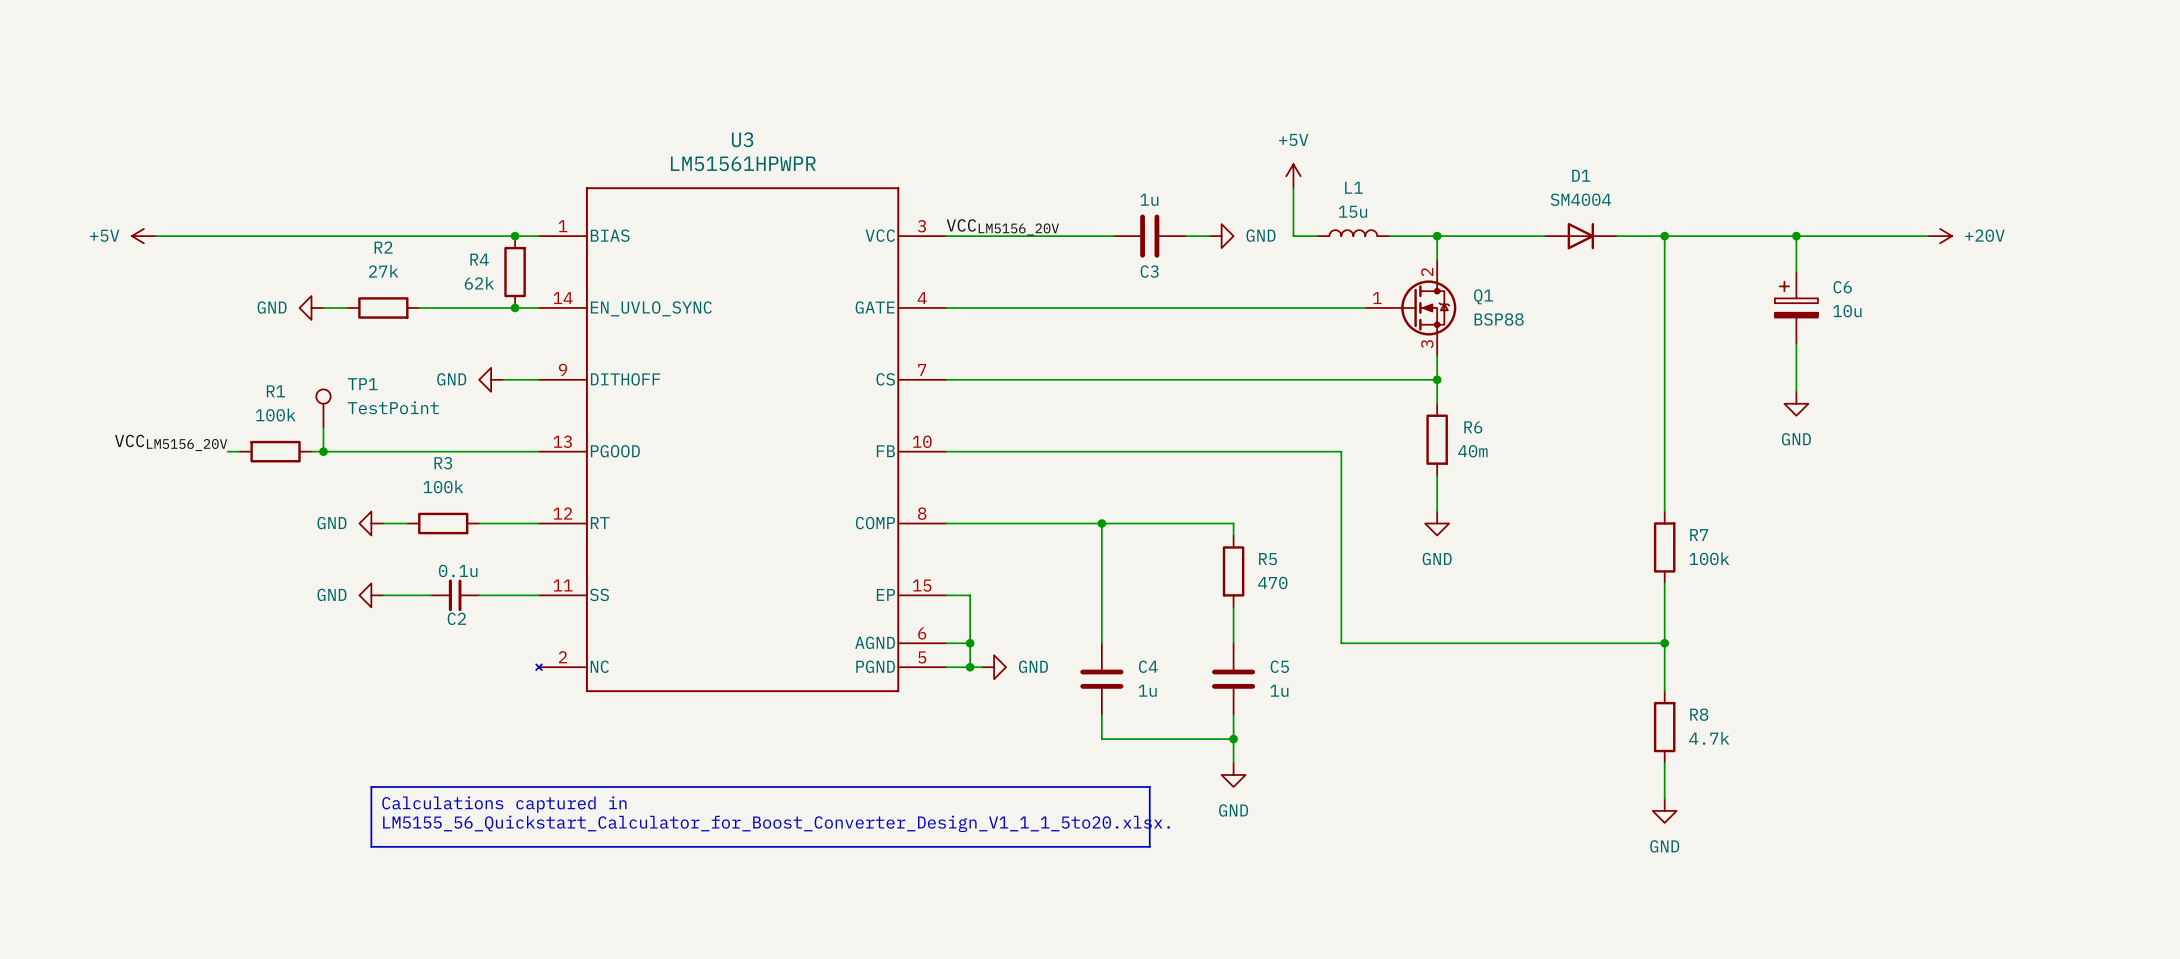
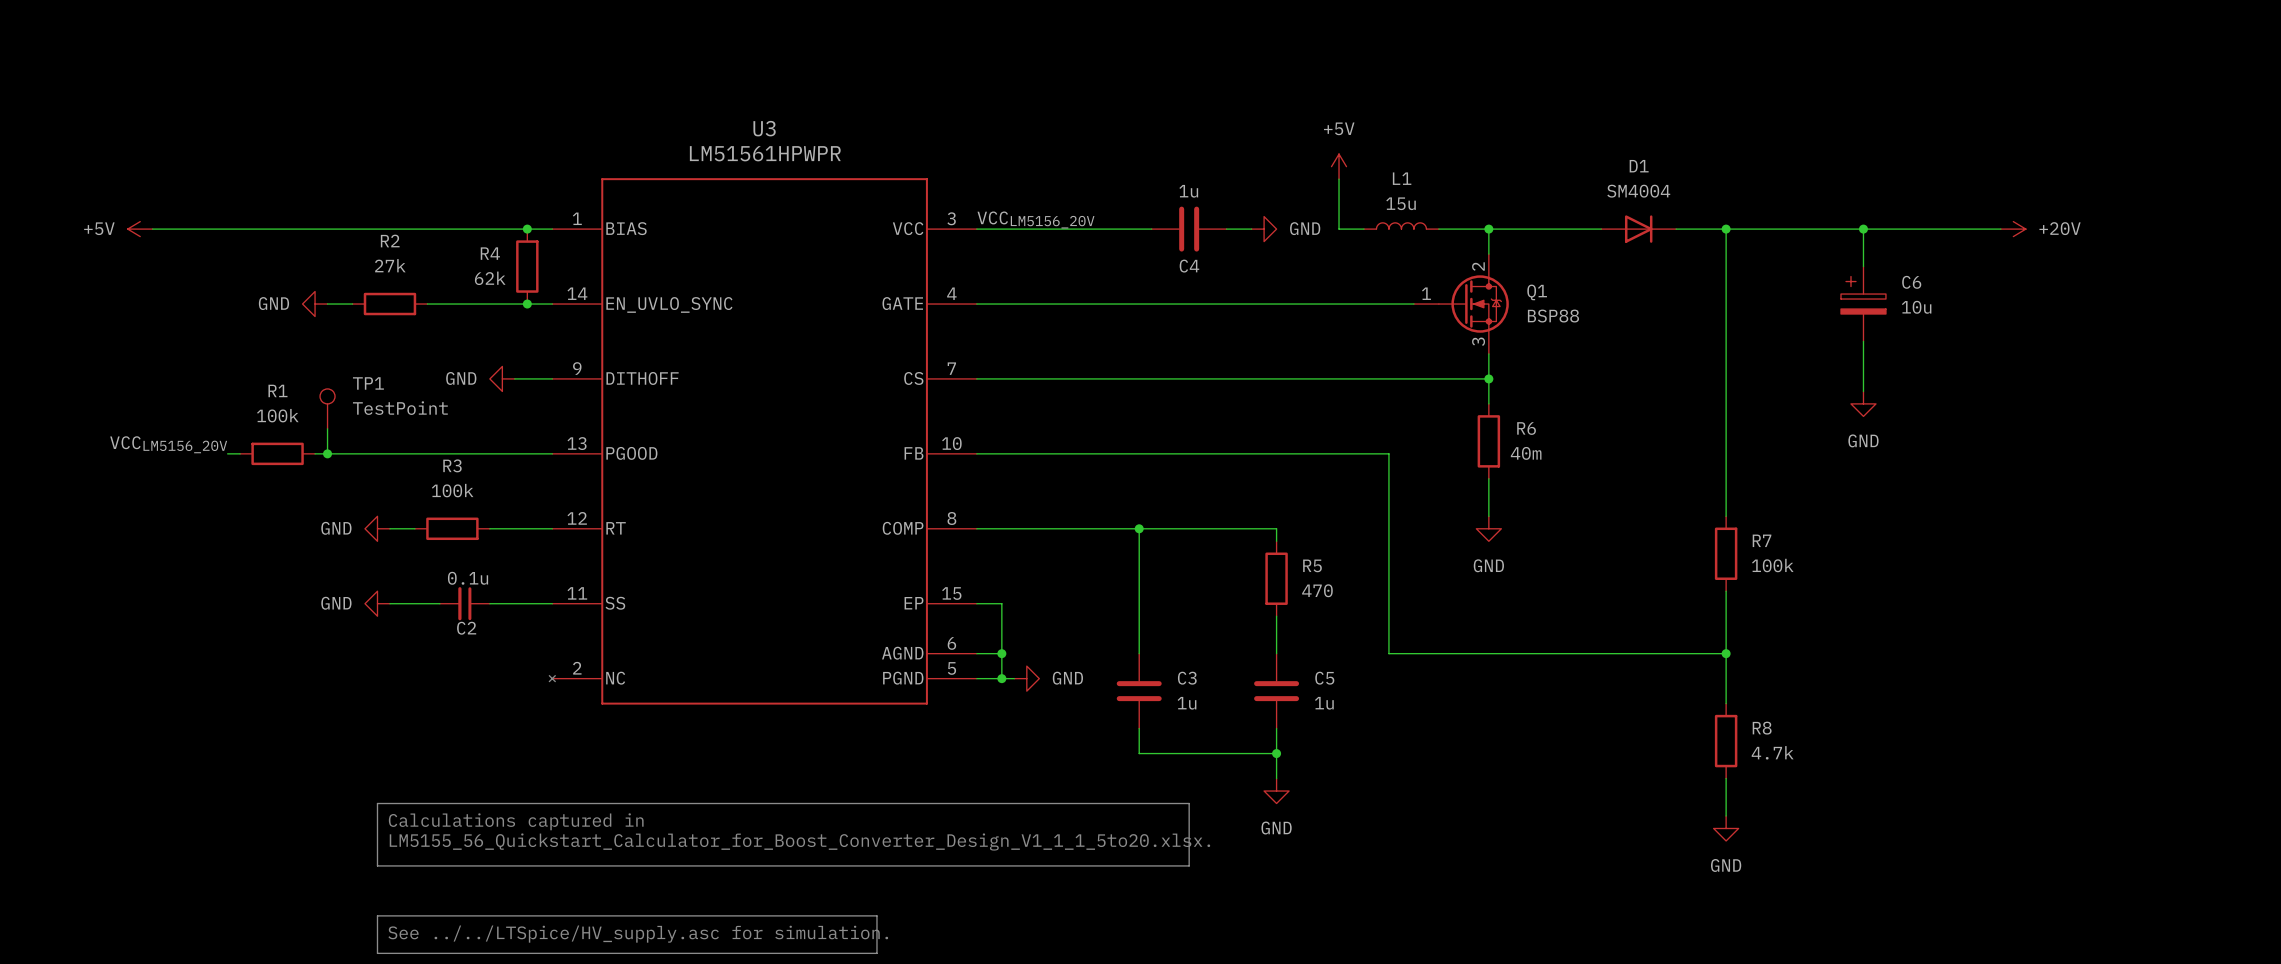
C3 name: C3 (1149, 271) -> C4 (1189, 266)
C4 name: C4 (1148, 666) -> C3 (1187, 678)
line: none -> (377, 915) (876, 915) (876, 953) (377, 953) (377, 915)
text: none -> See ../../LTSpice/HV_supply.asc for simulation. (638, 934)

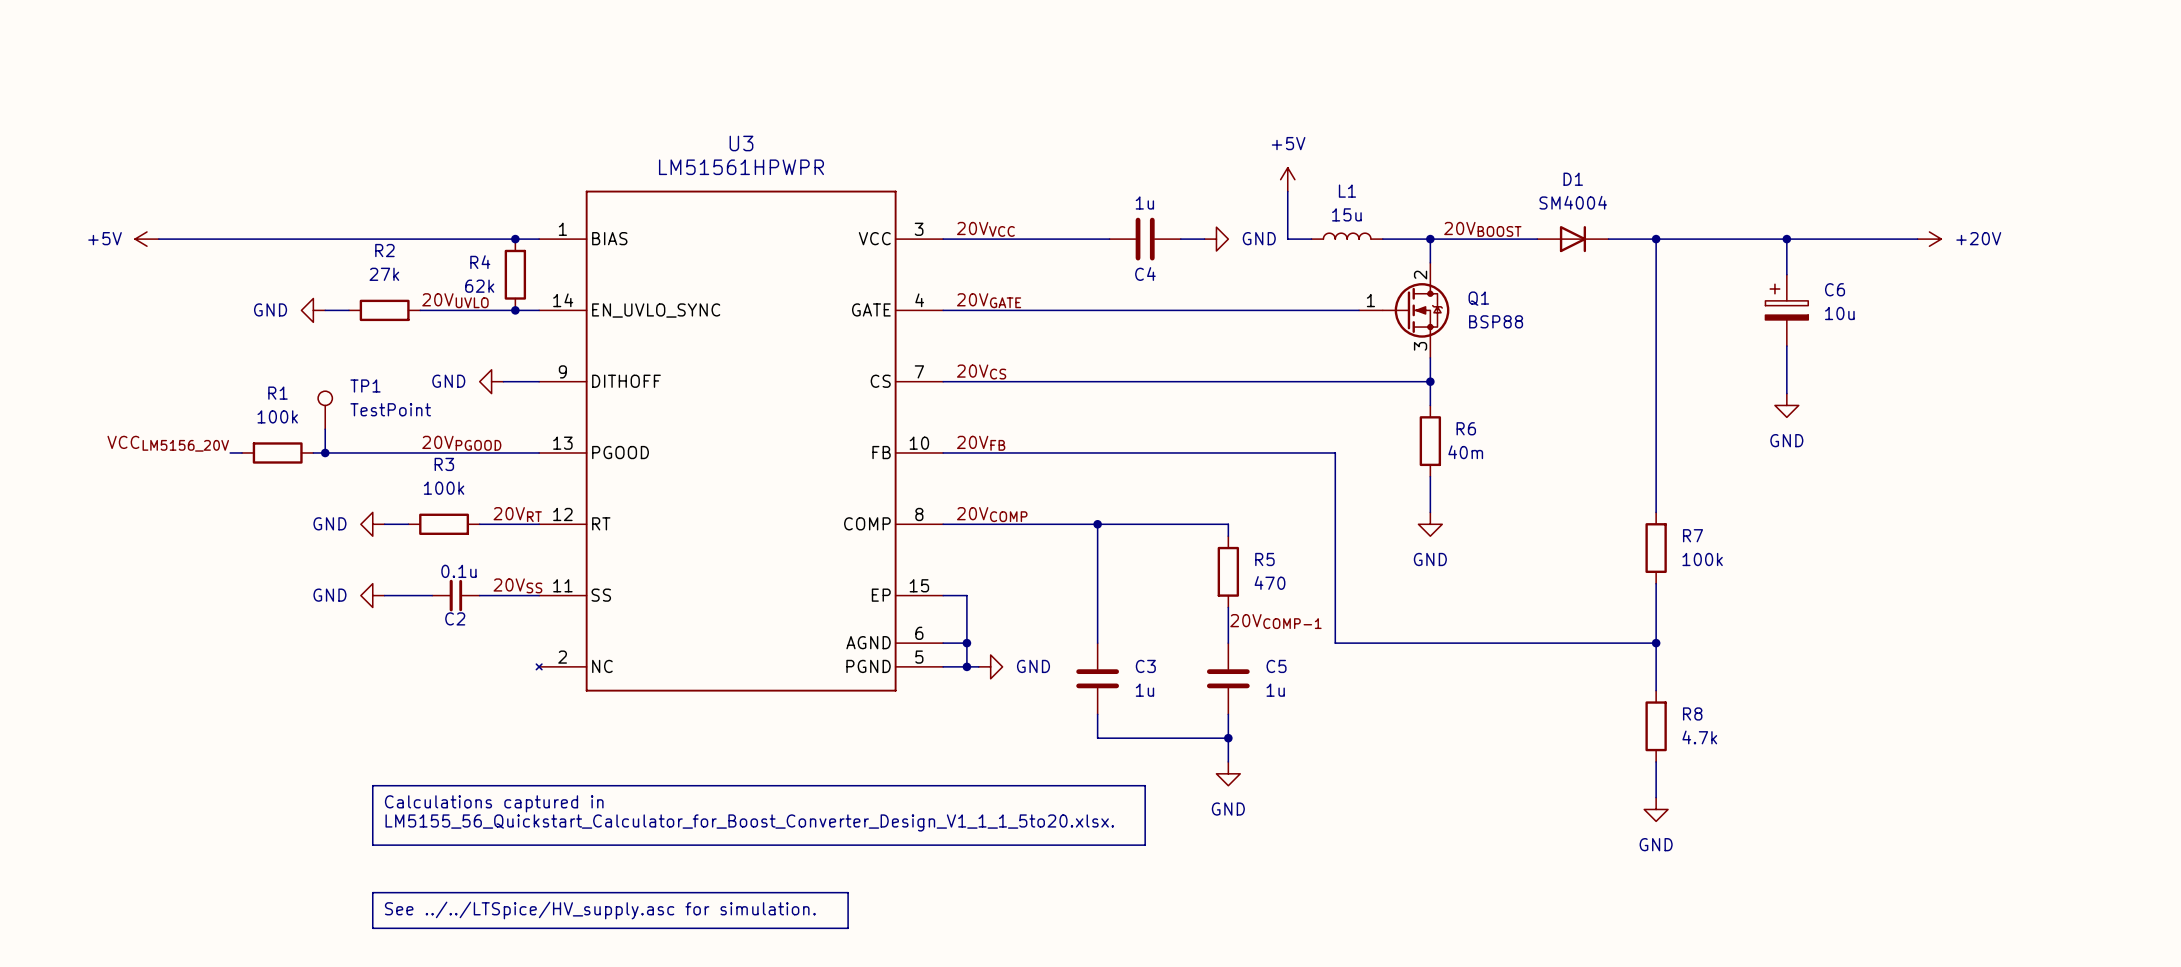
label: none -> 20VVCC (985, 229)
label: none -> 20VBOOST (1482, 229)
label: VCCLM5156_20V (1035, 219) -> none
label: none -> 20VUVLO (455, 300)
label: none -> 20VGATE (989, 300)
label: none -> 20VCS (981, 371)
label: none -> 20VPGOOD (461, 443)
label: none -> 20VFB (981, 443)
label: none -> 20VRT (517, 514)
label: none -> 20VCOMP (992, 514)
label: none -> 20VSS (517, 585)
label: none -> 20VCOMP-1 (1275, 621)

